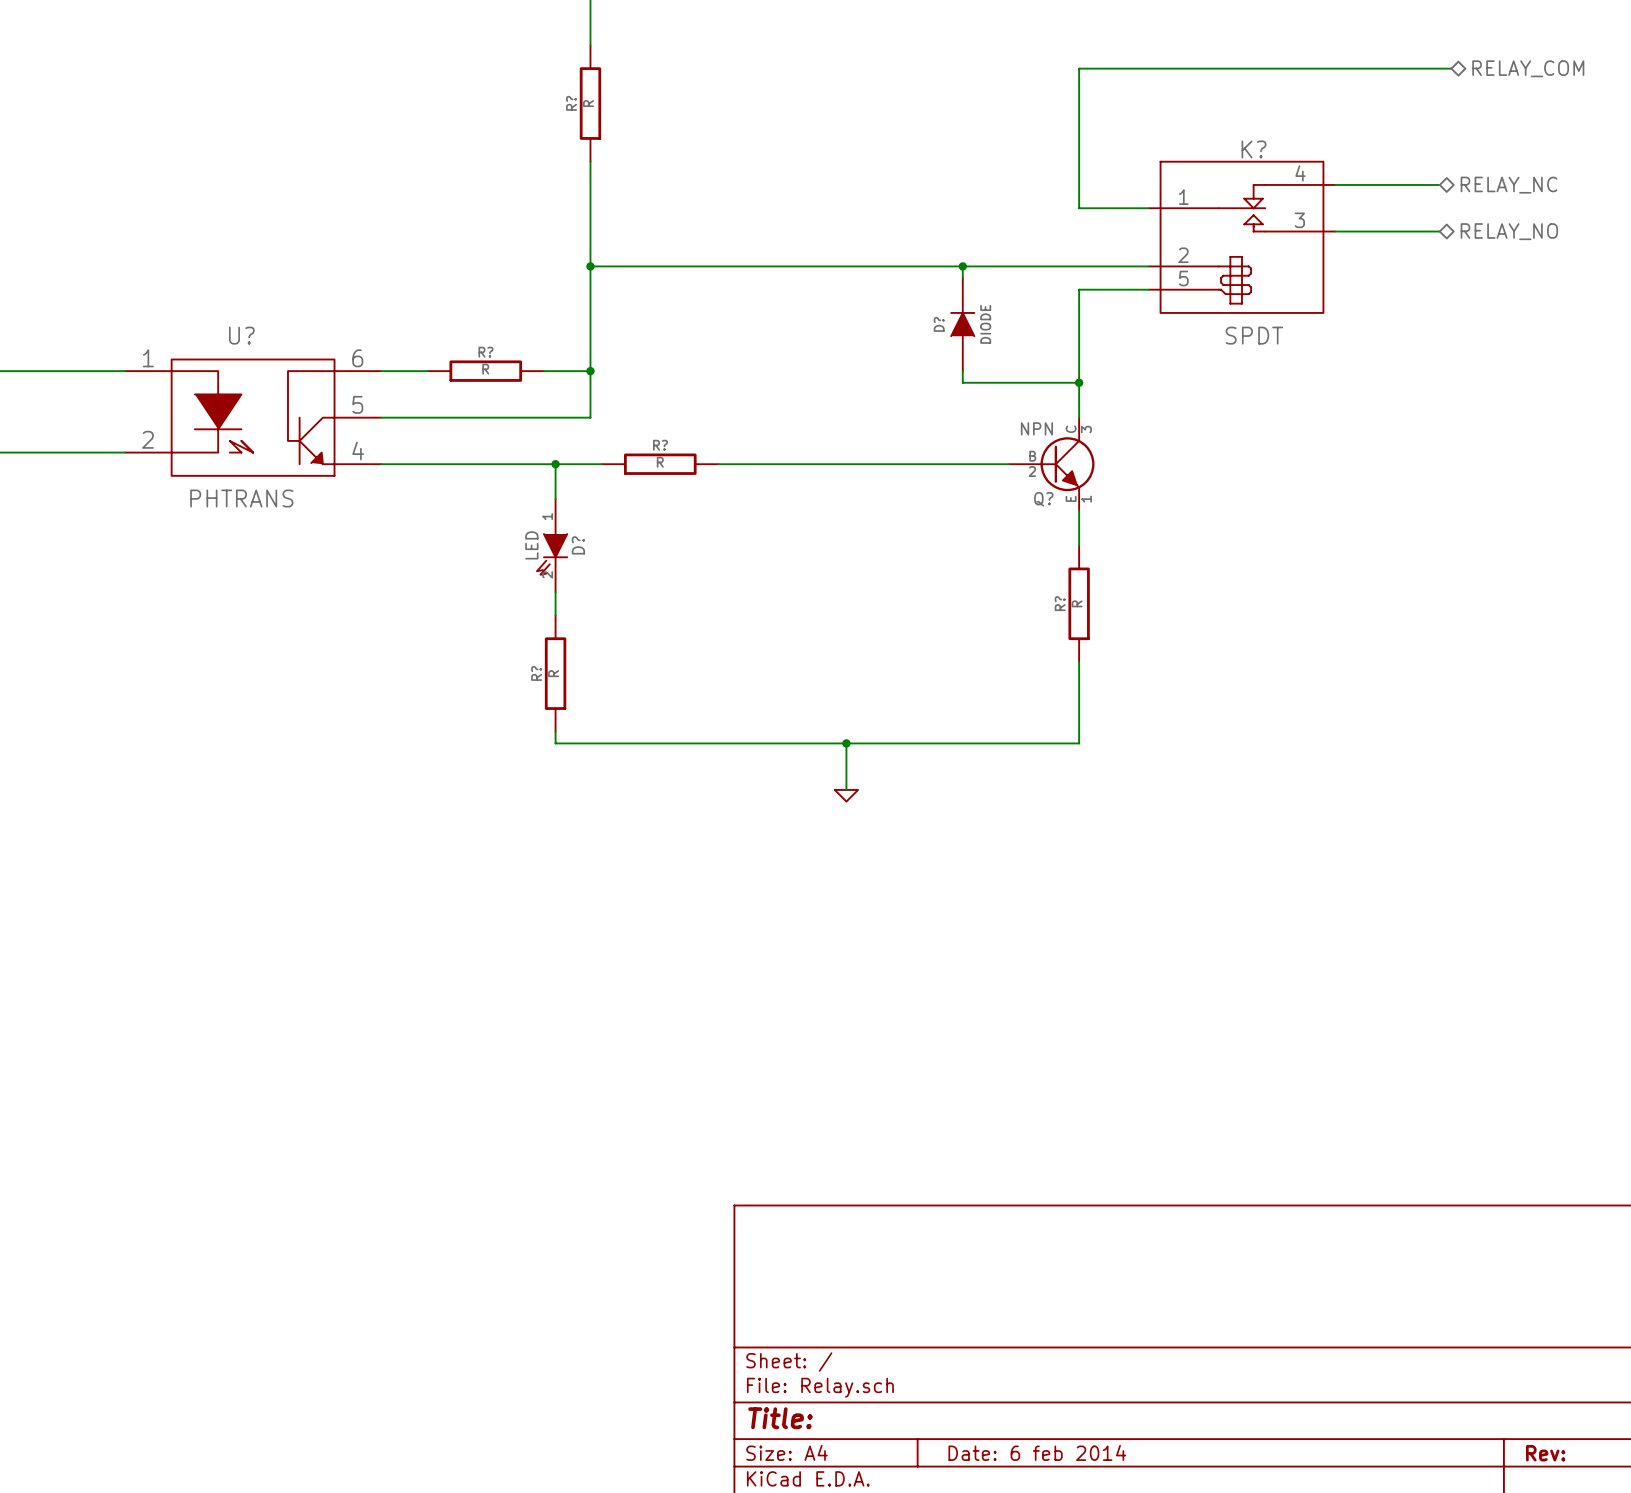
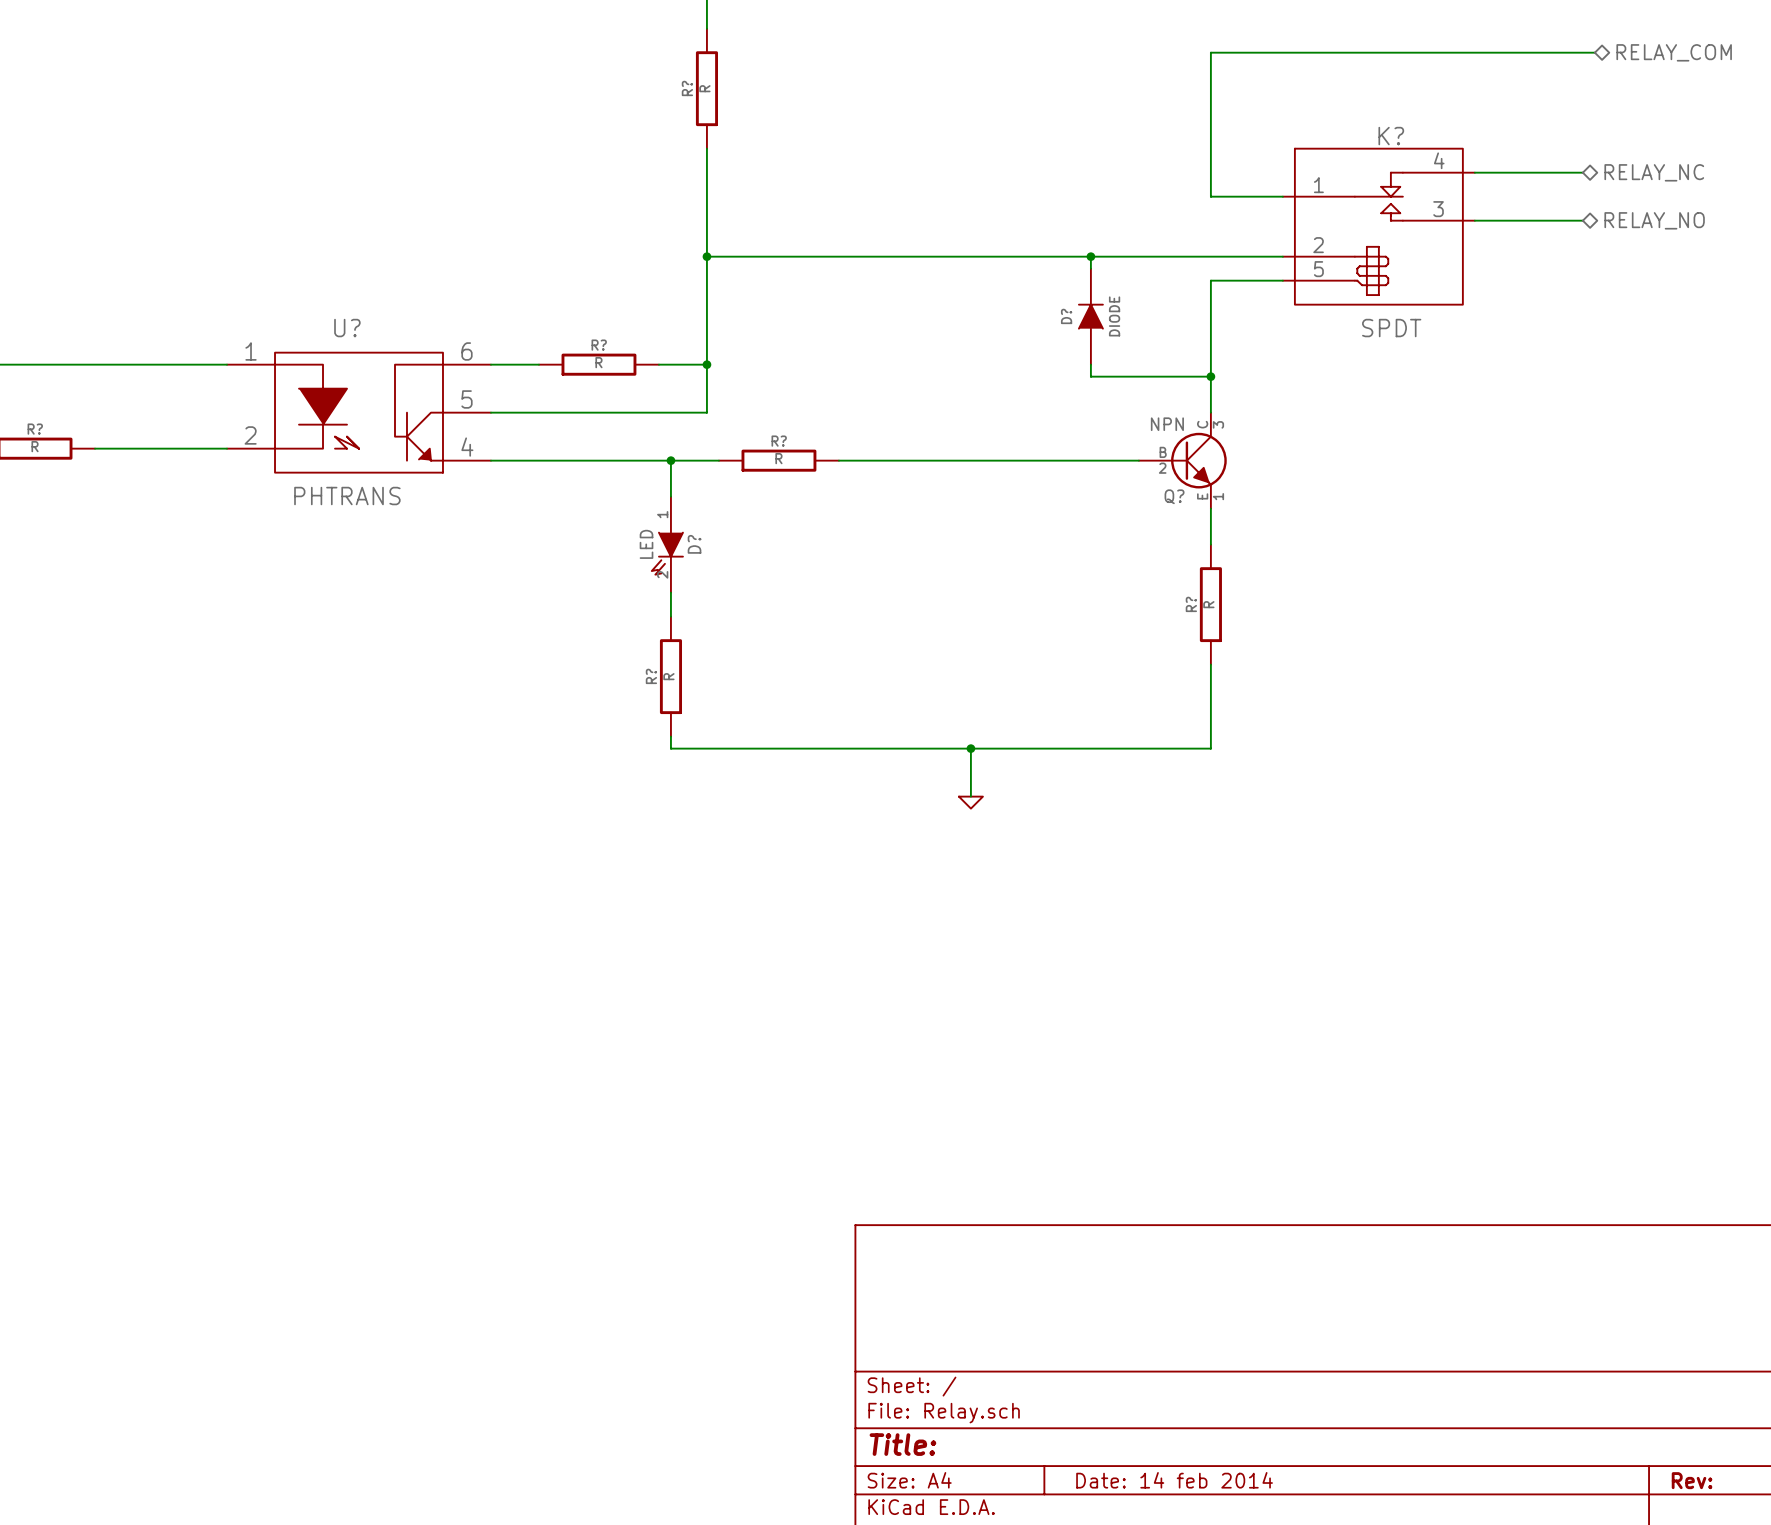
title block: Date: 6 feb 2014 (1037, 1452) -> Date: 14 feb 2014 (1174, 1480)

